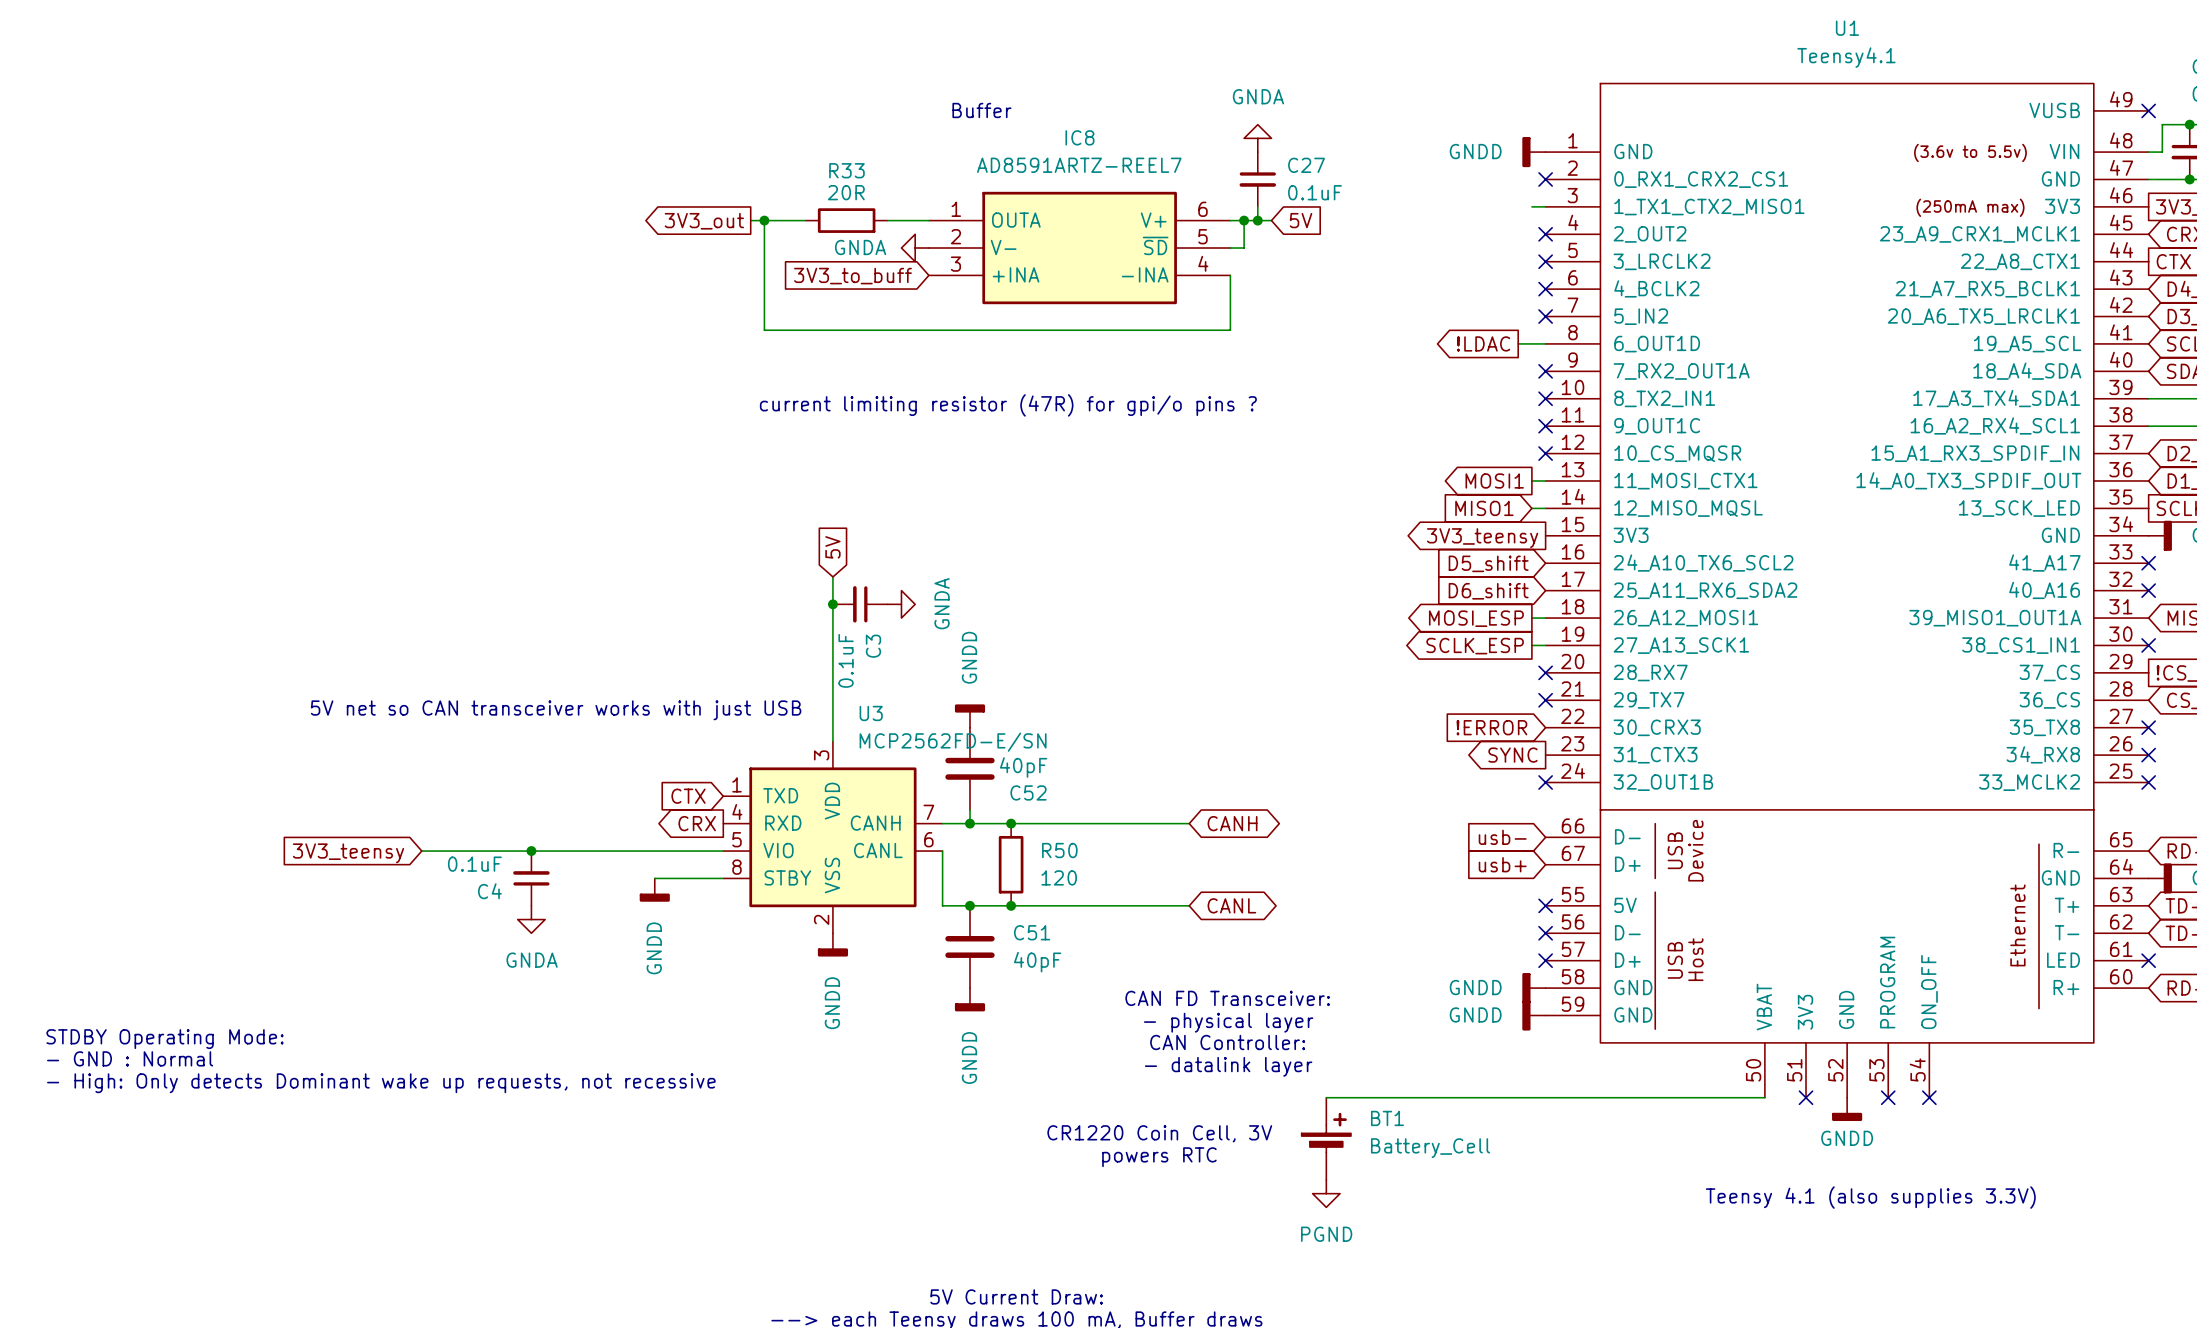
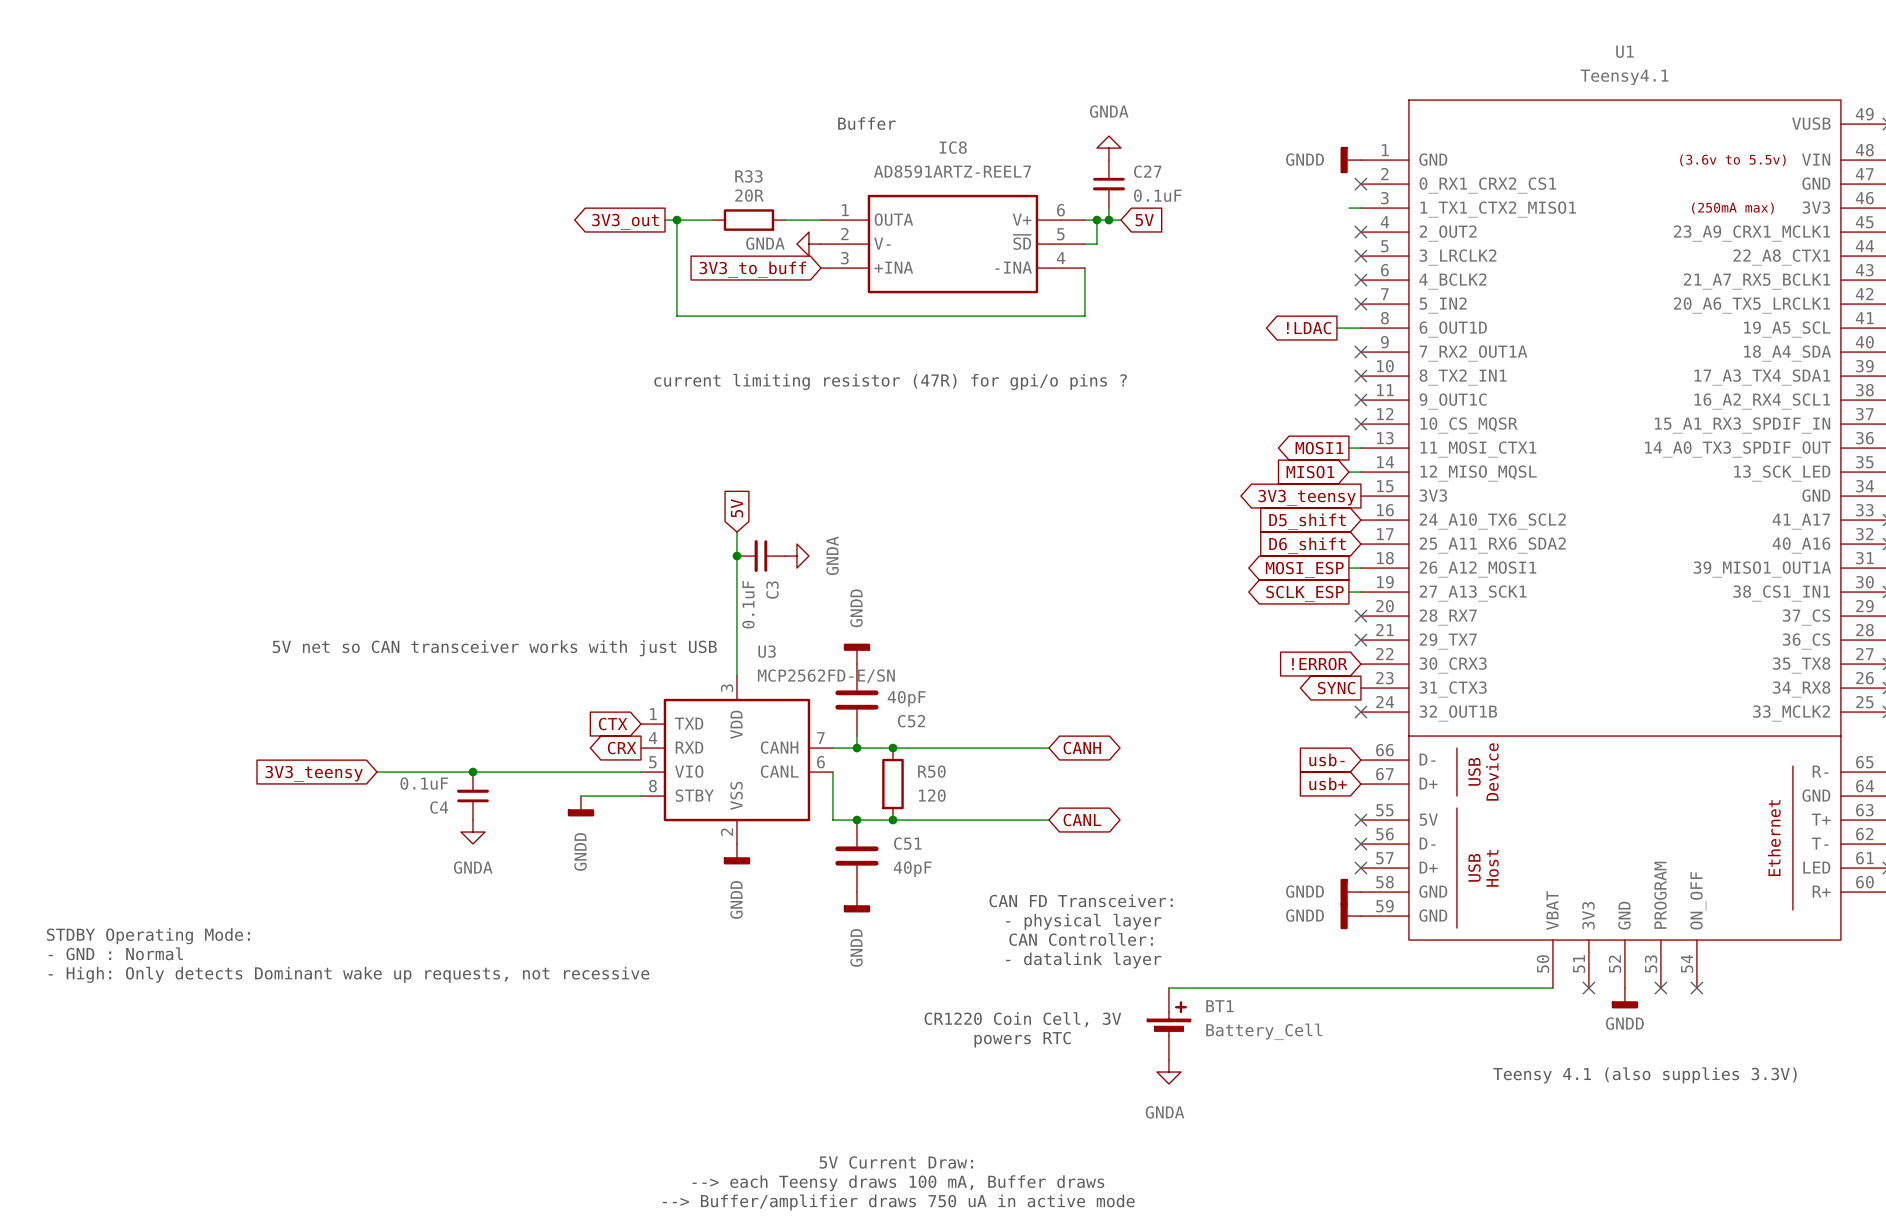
power symbol: PGND (1326, 1193) -> GNDA (1168, 1072)

